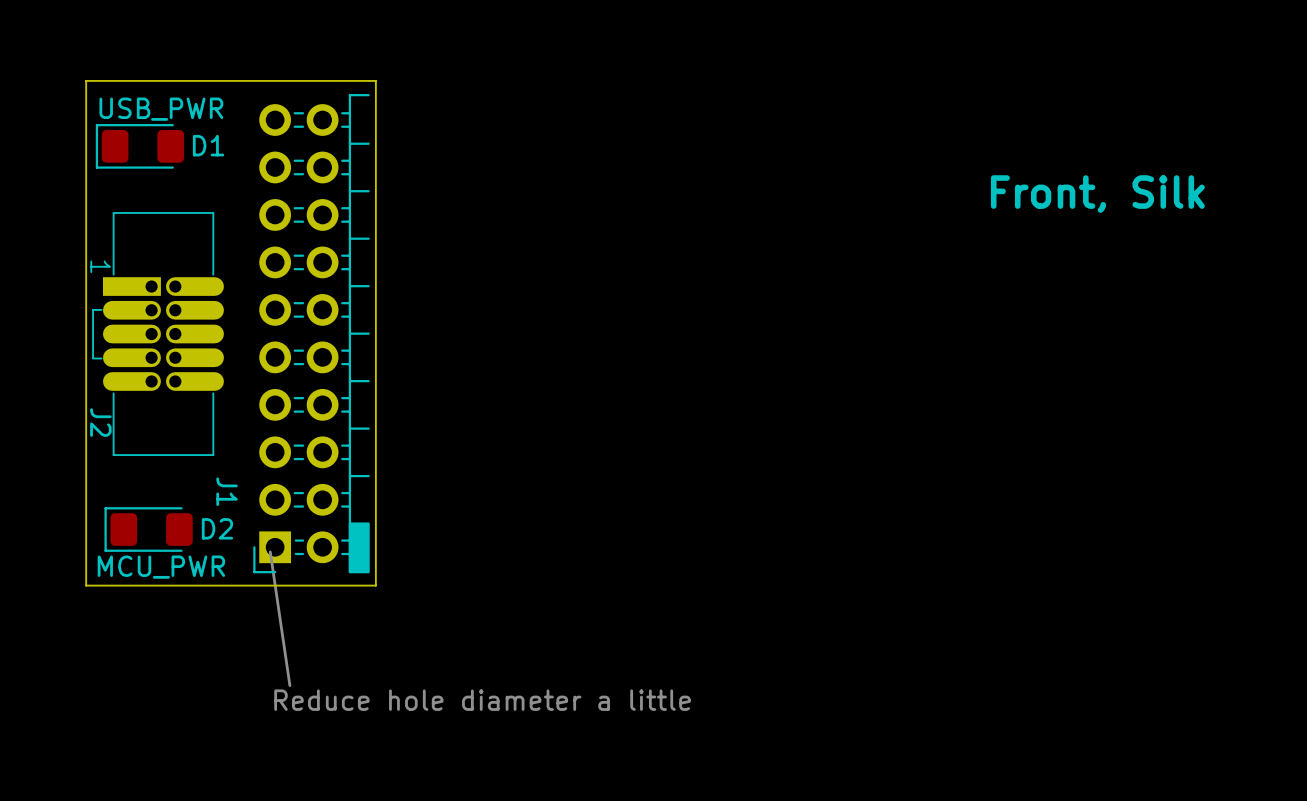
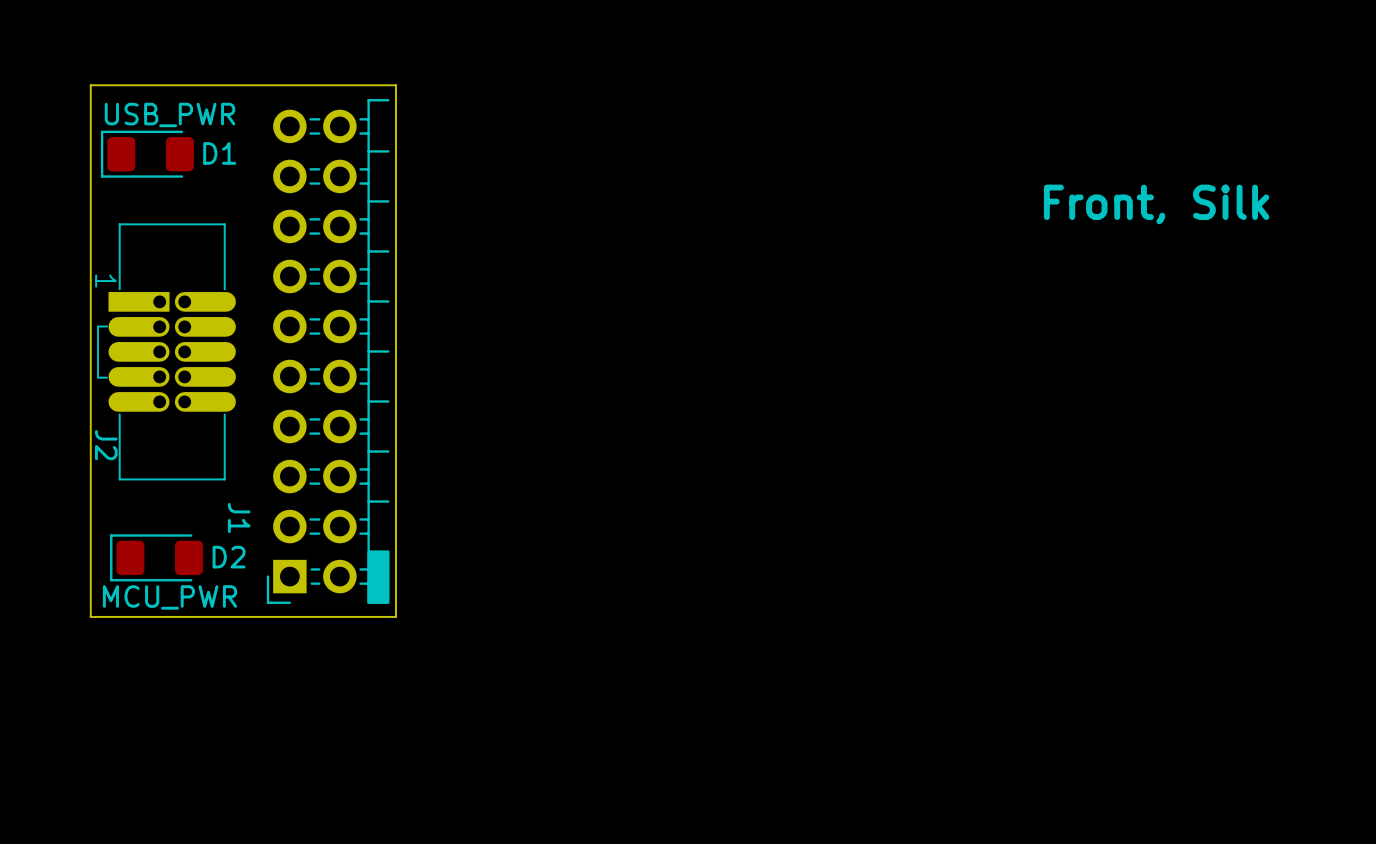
line: (270, 551) (289, 685) -> none
text: Reduce hole diameter a little (482, 700) -> none

